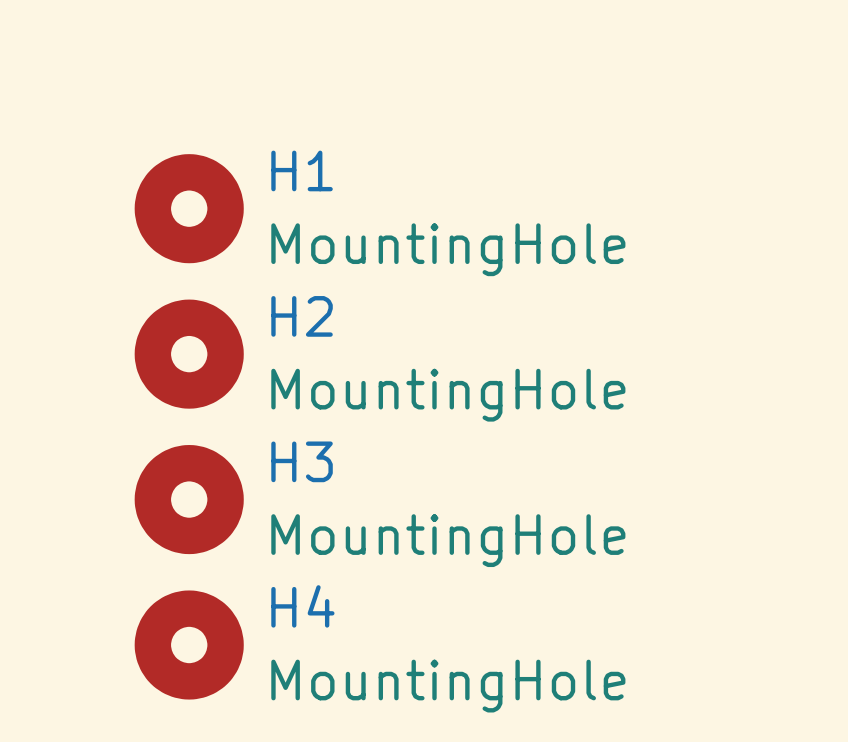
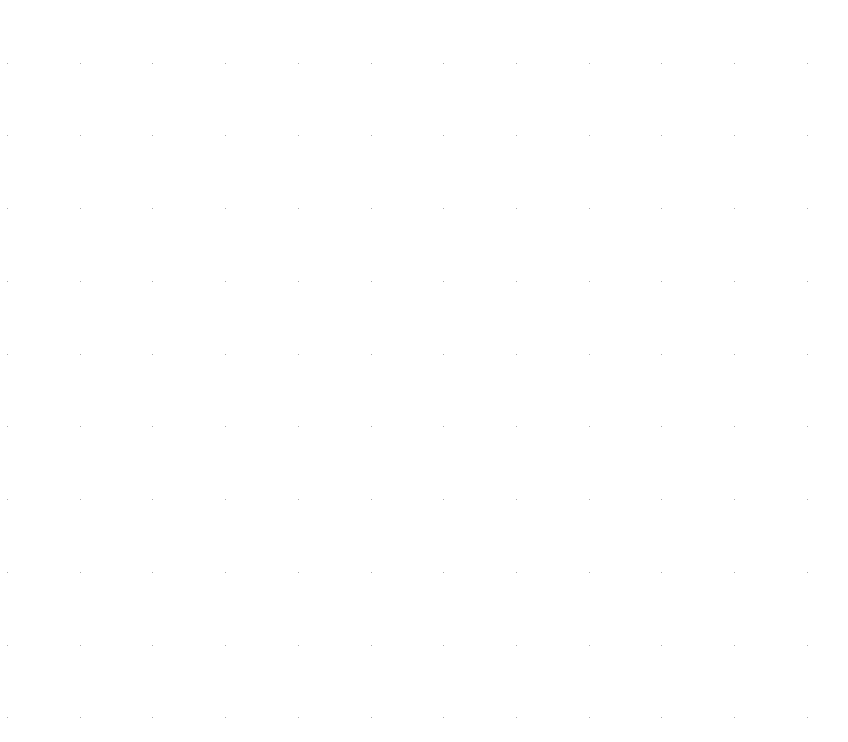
H1: MountingHole (189, 208) -> none
H2: MountingHole (189, 354) -> none
H3: MountingHole (189, 499) -> none
H4: MountingHole (189, 645) -> none

